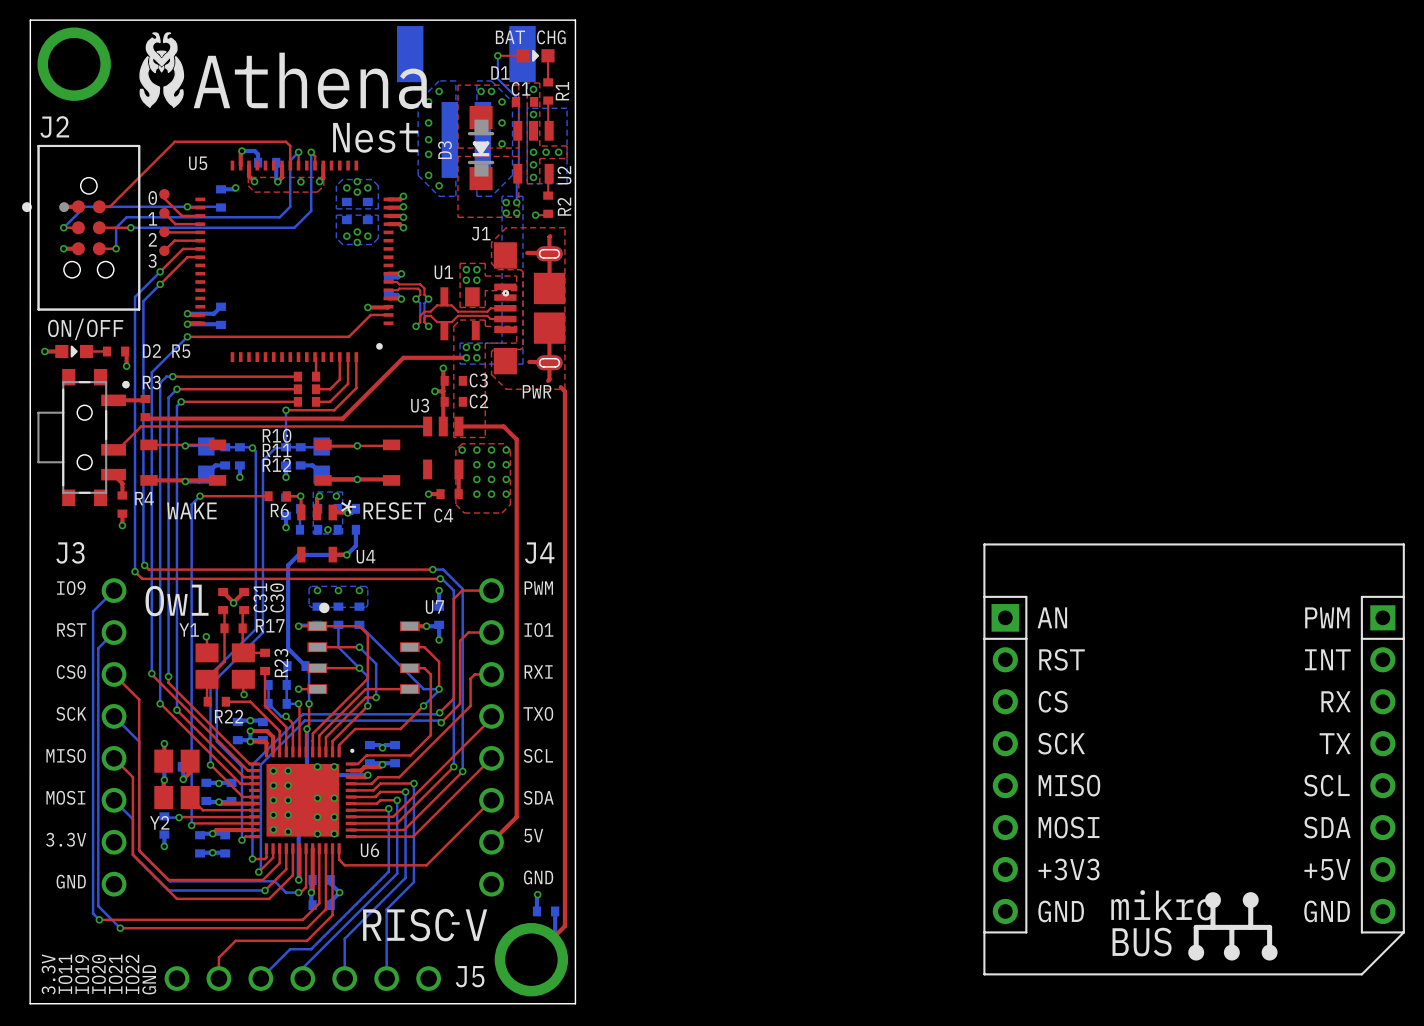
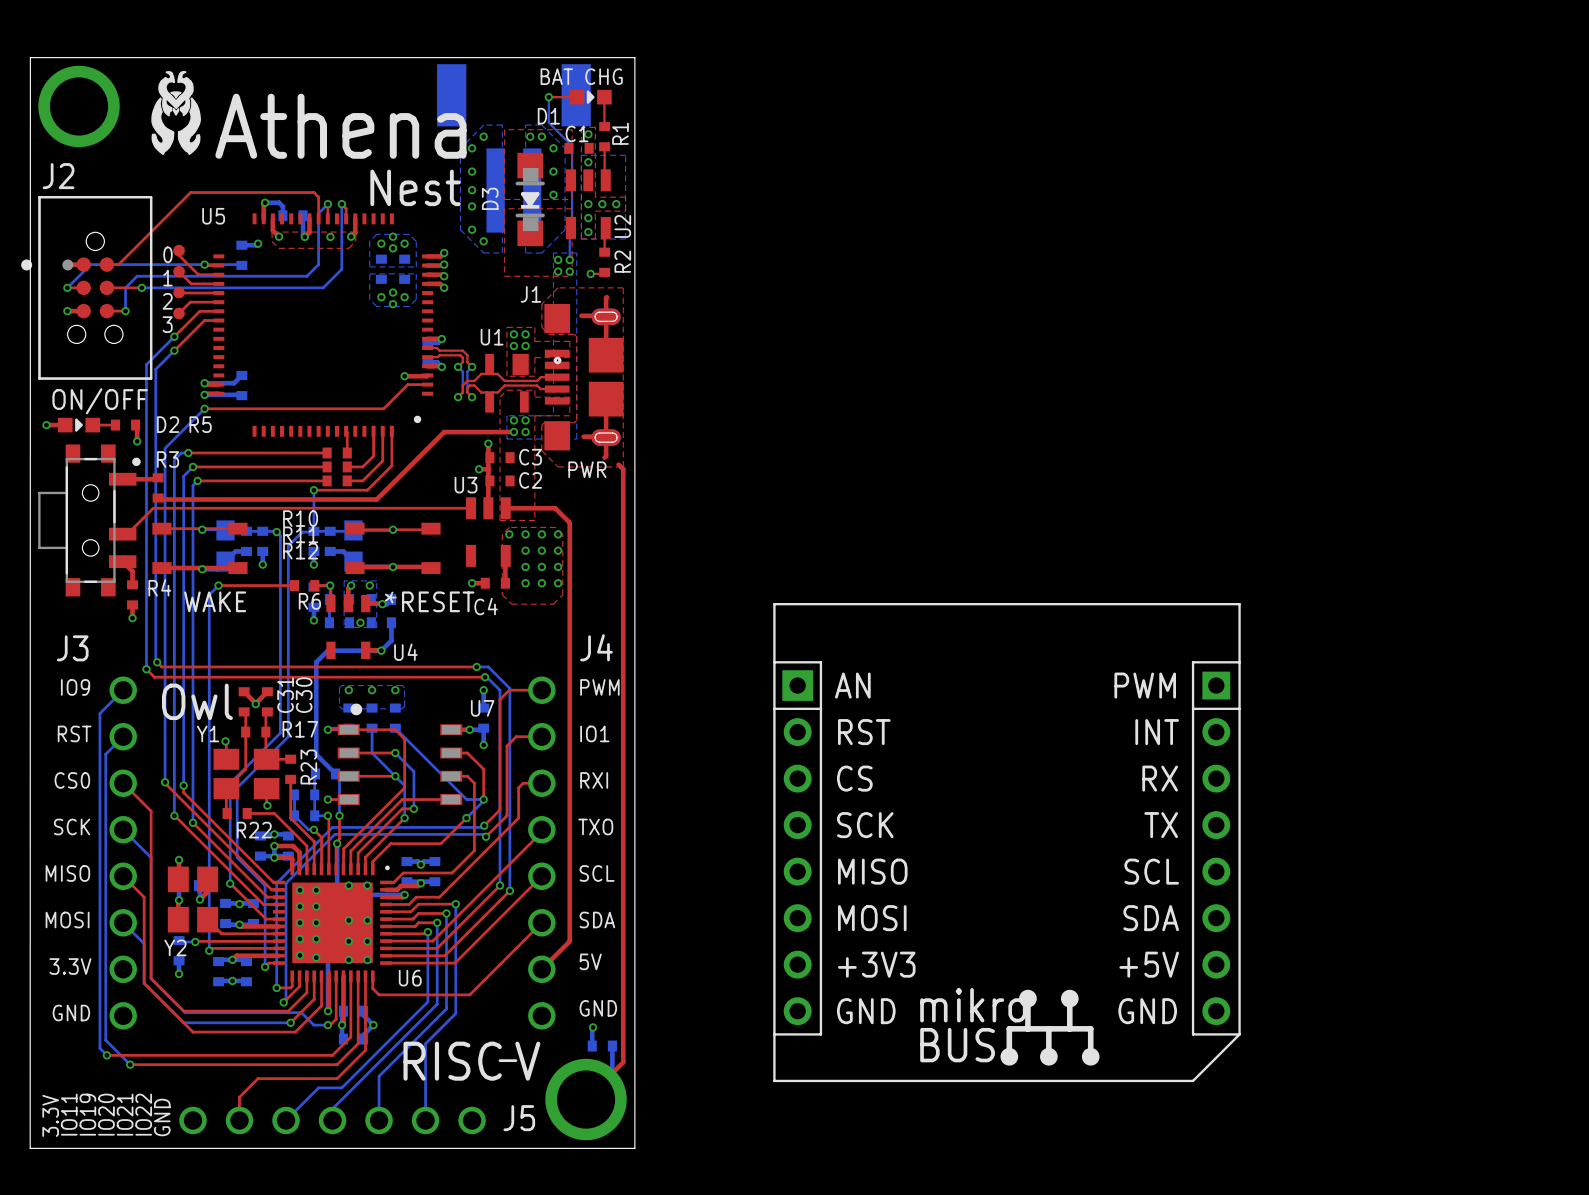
part position: (1194, 759) -> (1006, 842)

